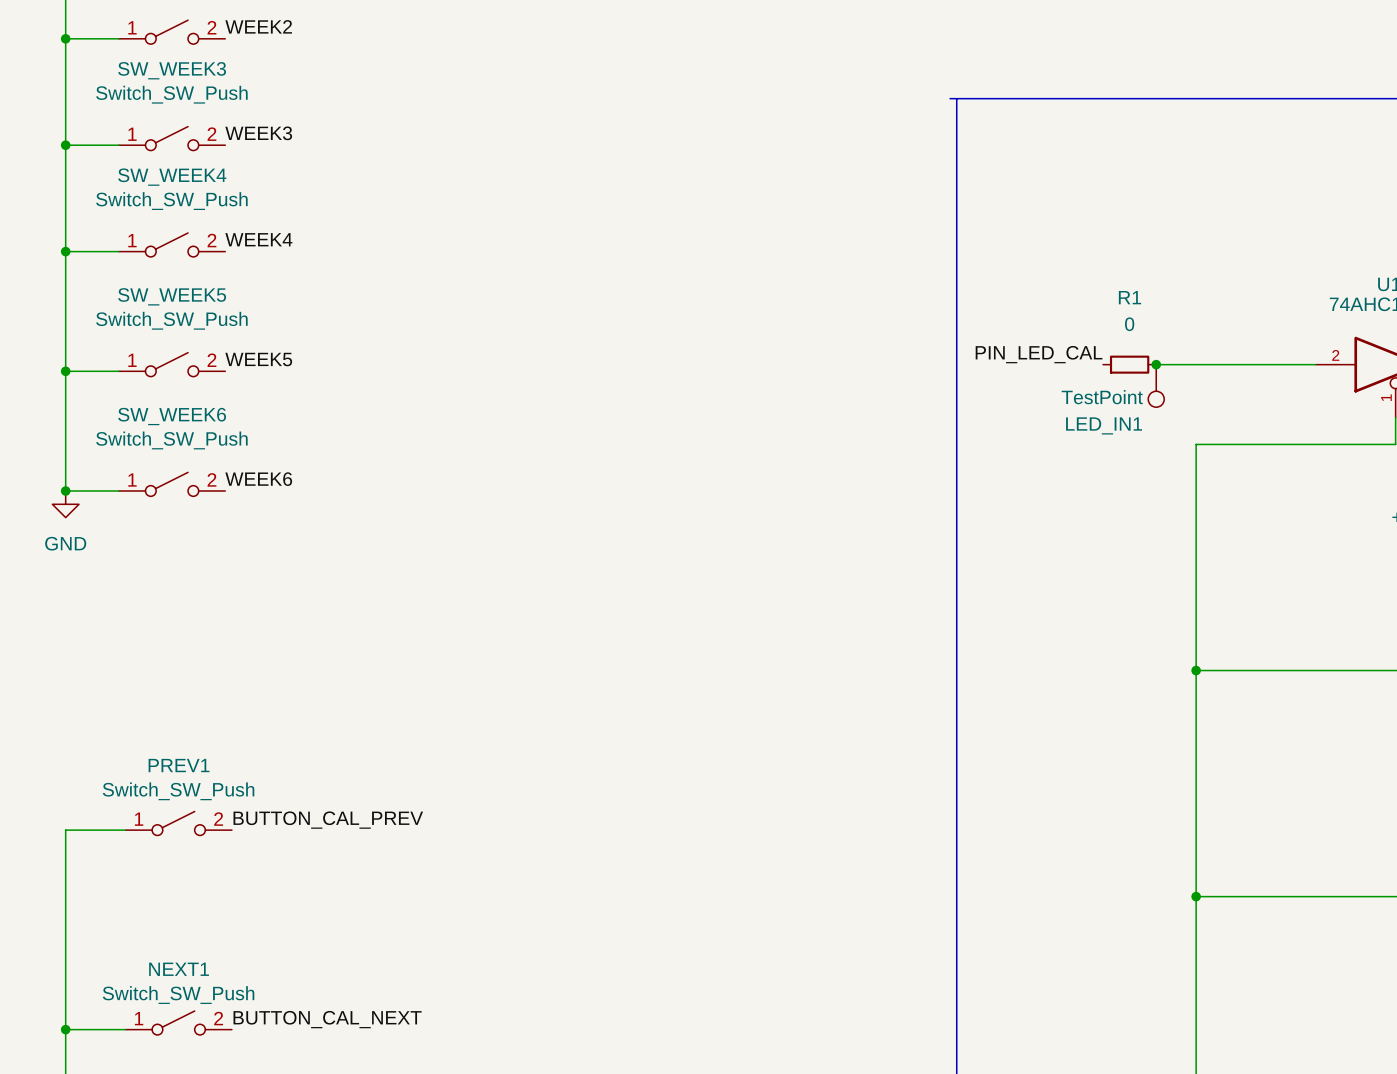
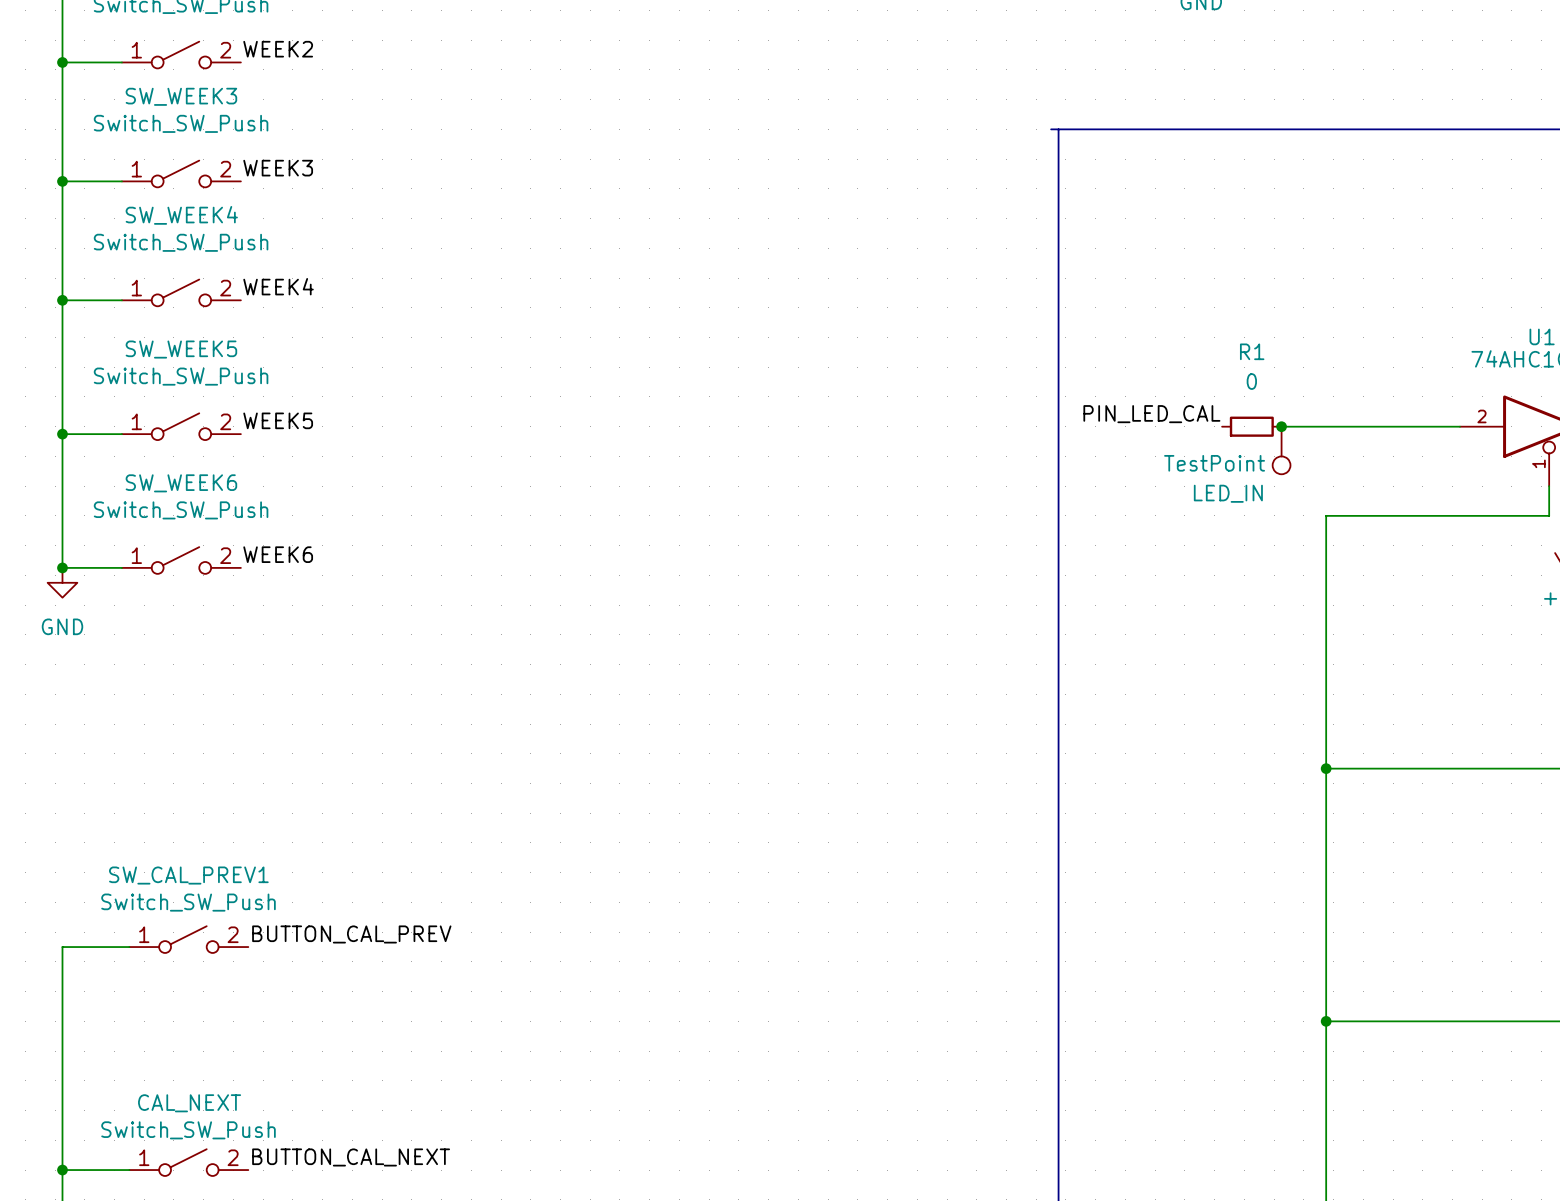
LED_IN1 name: LED_IN1 (1104, 425) -> LED_IN (1228, 493)
PREV1 name: PREV1 (179, 765) -> SW_CAL_PREV1 (188, 875)
NEXT1 name: NEXT1 (179, 969) -> CAL_NEXT (189, 1103)

